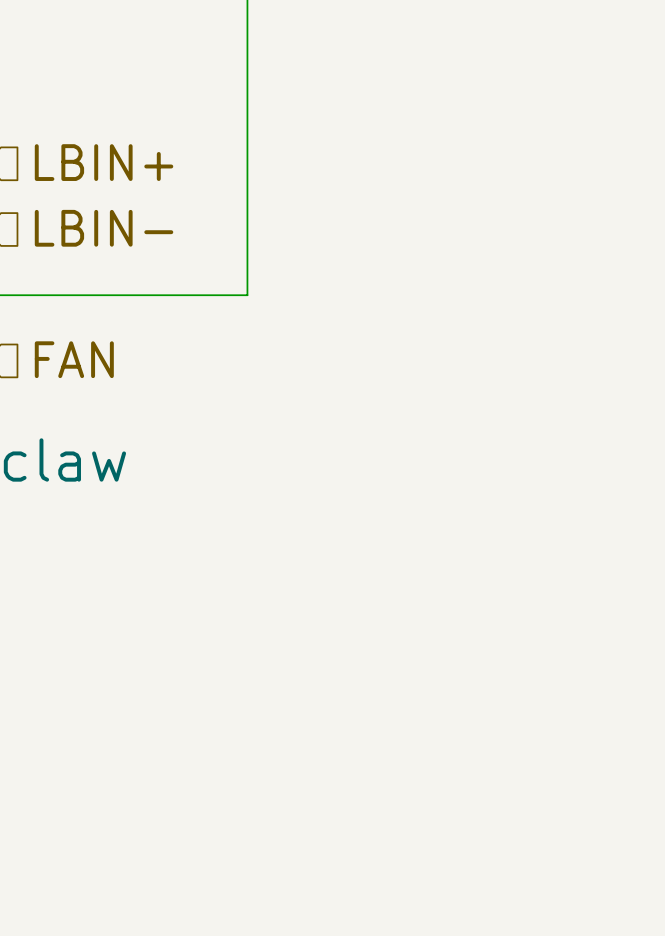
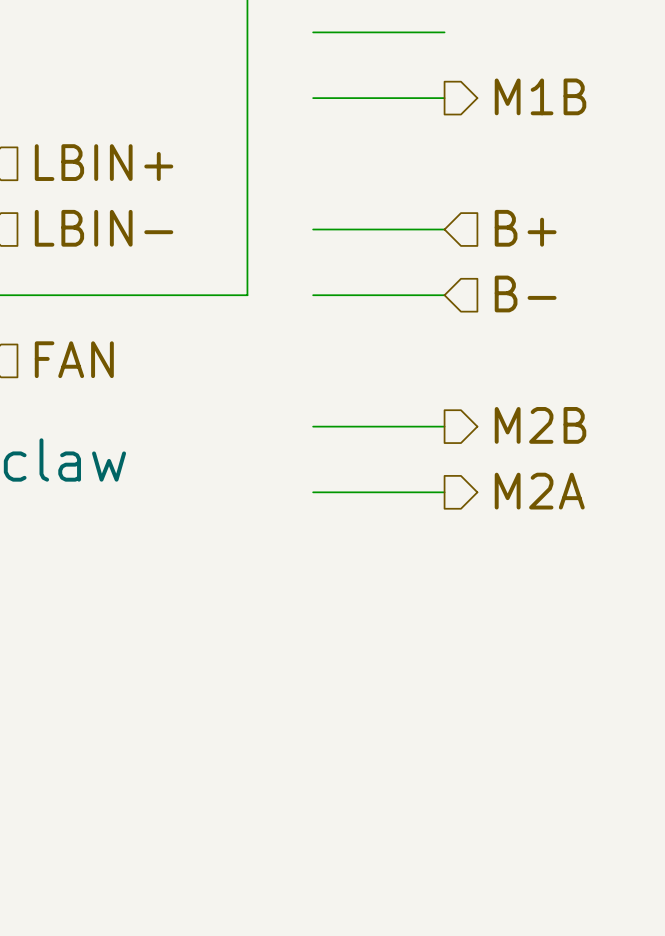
wire: none -> (313, 32) (444, 32)
hierarchical label: none -> M1B (540, 96)
wire: none -> (313, 98) (444, 98)
hierarchical label: none -> B+ (525, 228)
wire: none -> (313, 229) (444, 229)
hierarchical label: none -> B- (525, 293)
wire: none -> (313, 295) (444, 295)
hierarchical label: none -> M2B (540, 425)
wire: none -> (313, 426) (444, 426)
hierarchical label: none -> M2A (539, 491)
wire: none -> (313, 492) (444, 492)

